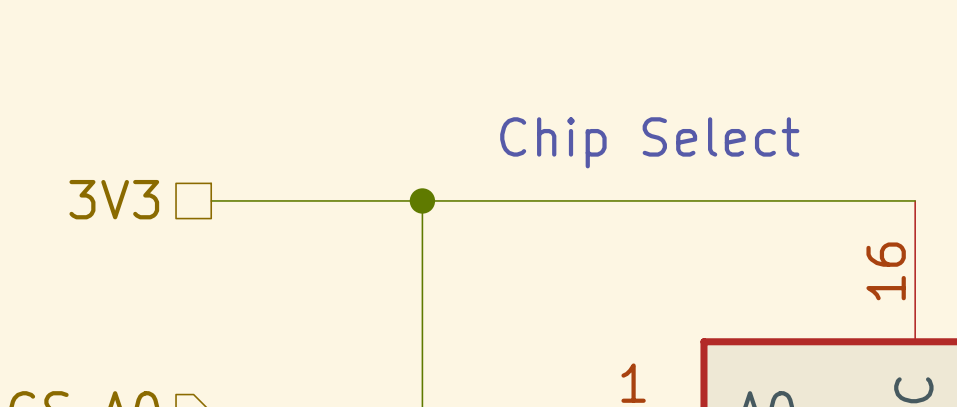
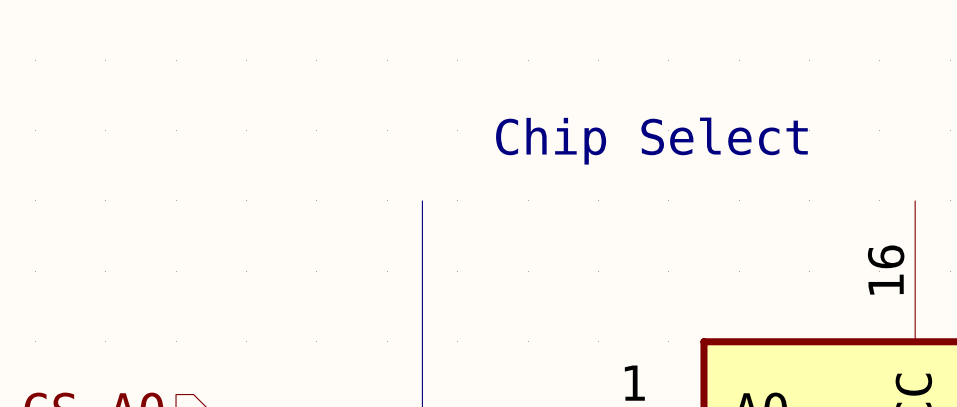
hierarchical label: 3V3 (114, 199) -> none
wire: (211, 200) (915, 200) -> none
junction: (422, 200) -> none

